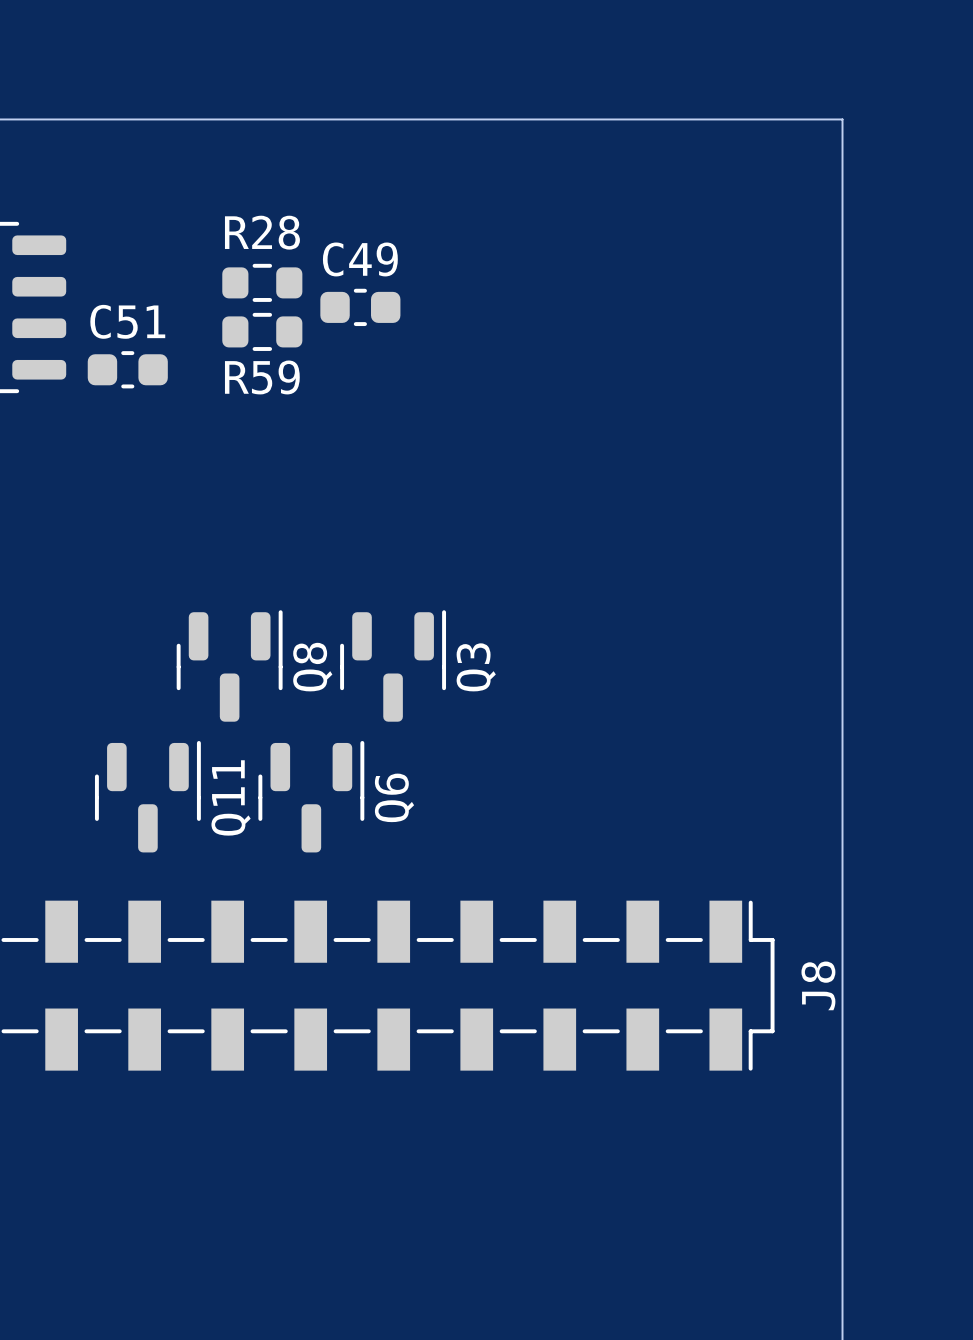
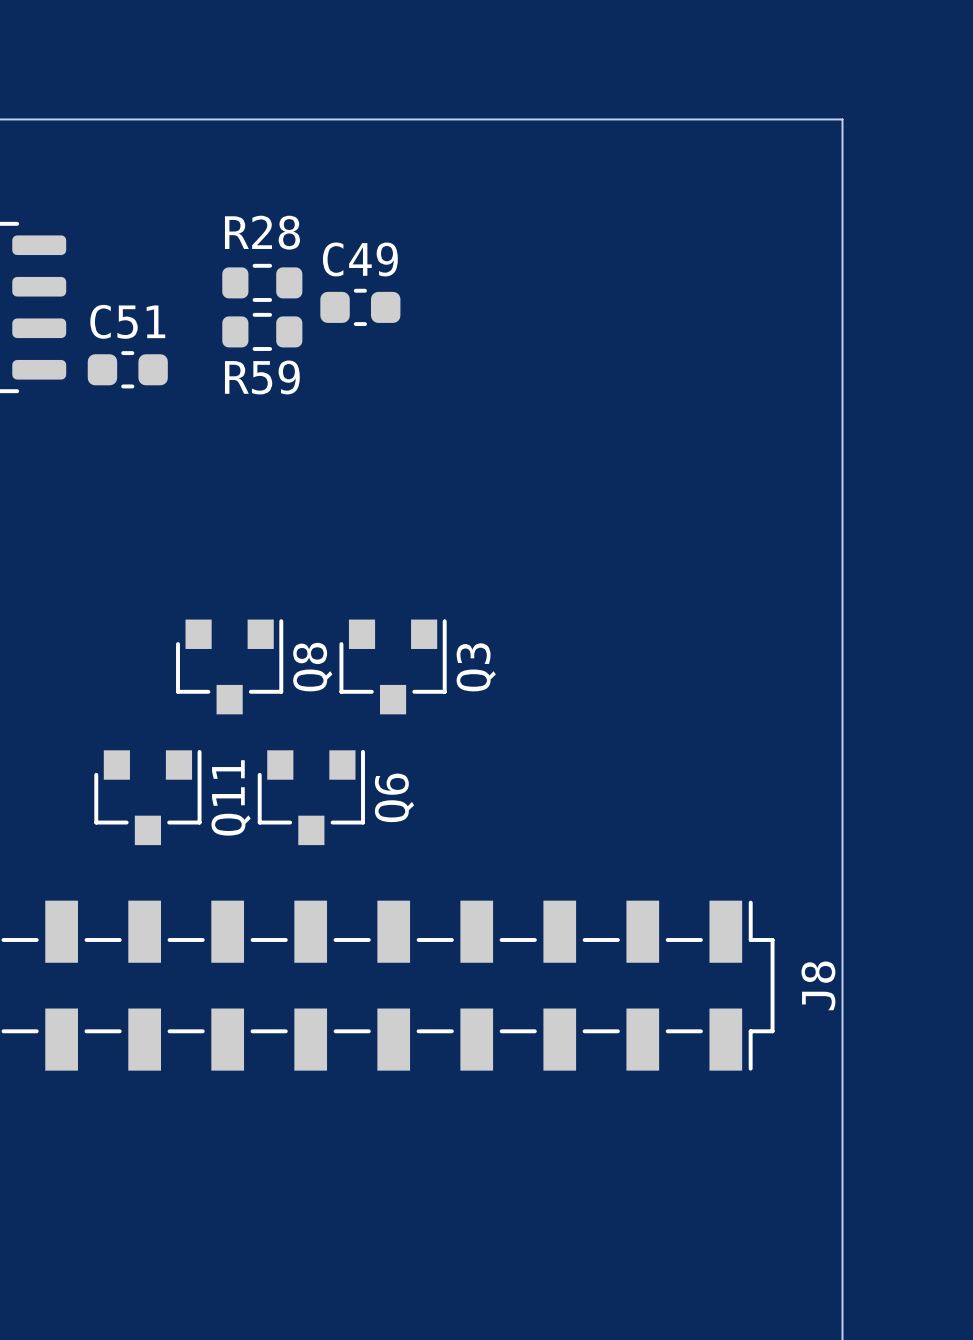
Q8 footprint: [176, 610, 283, 722] -> [176, 619, 284, 715]
Q3 footprint: [340, 610, 447, 722] -> [339, 619, 447, 715]
Q11 footprint: [94, 740, 201, 853] -> [94, 749, 202, 846]
Q6 footprint: [258, 740, 365, 853] -> [257, 749, 365, 846]

